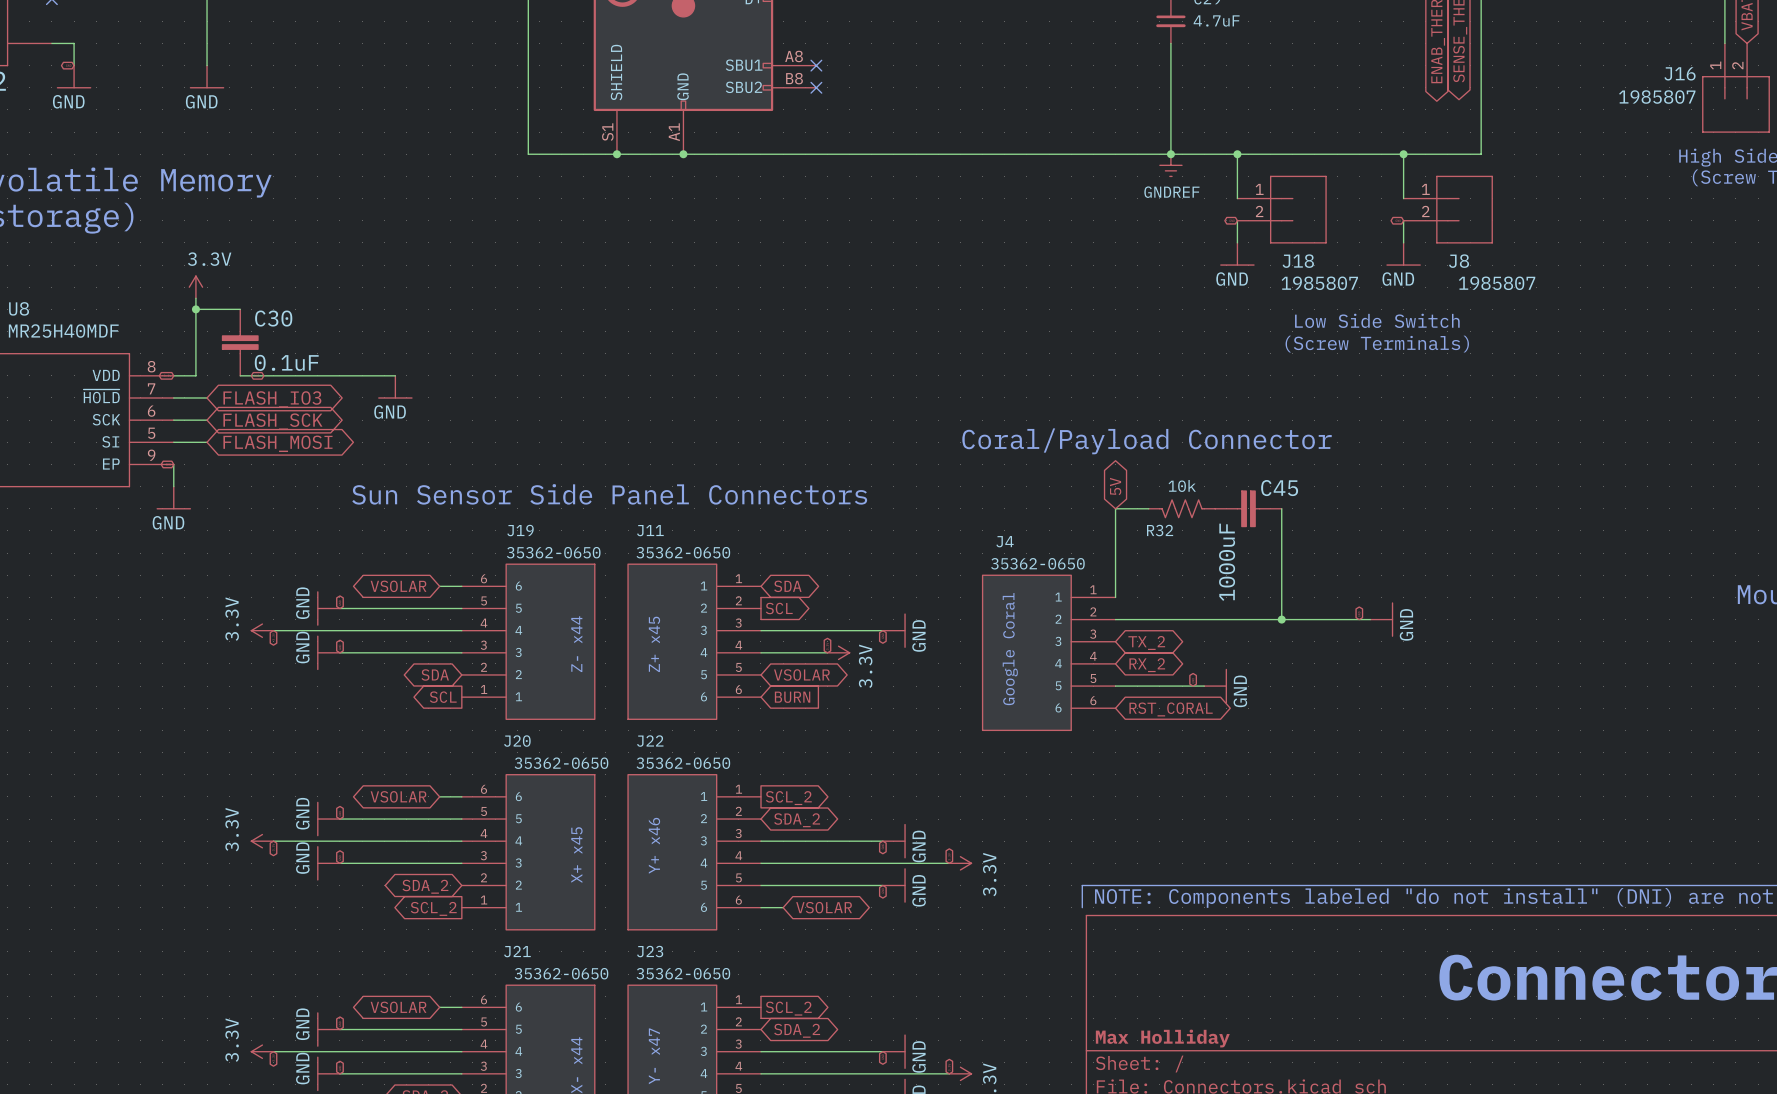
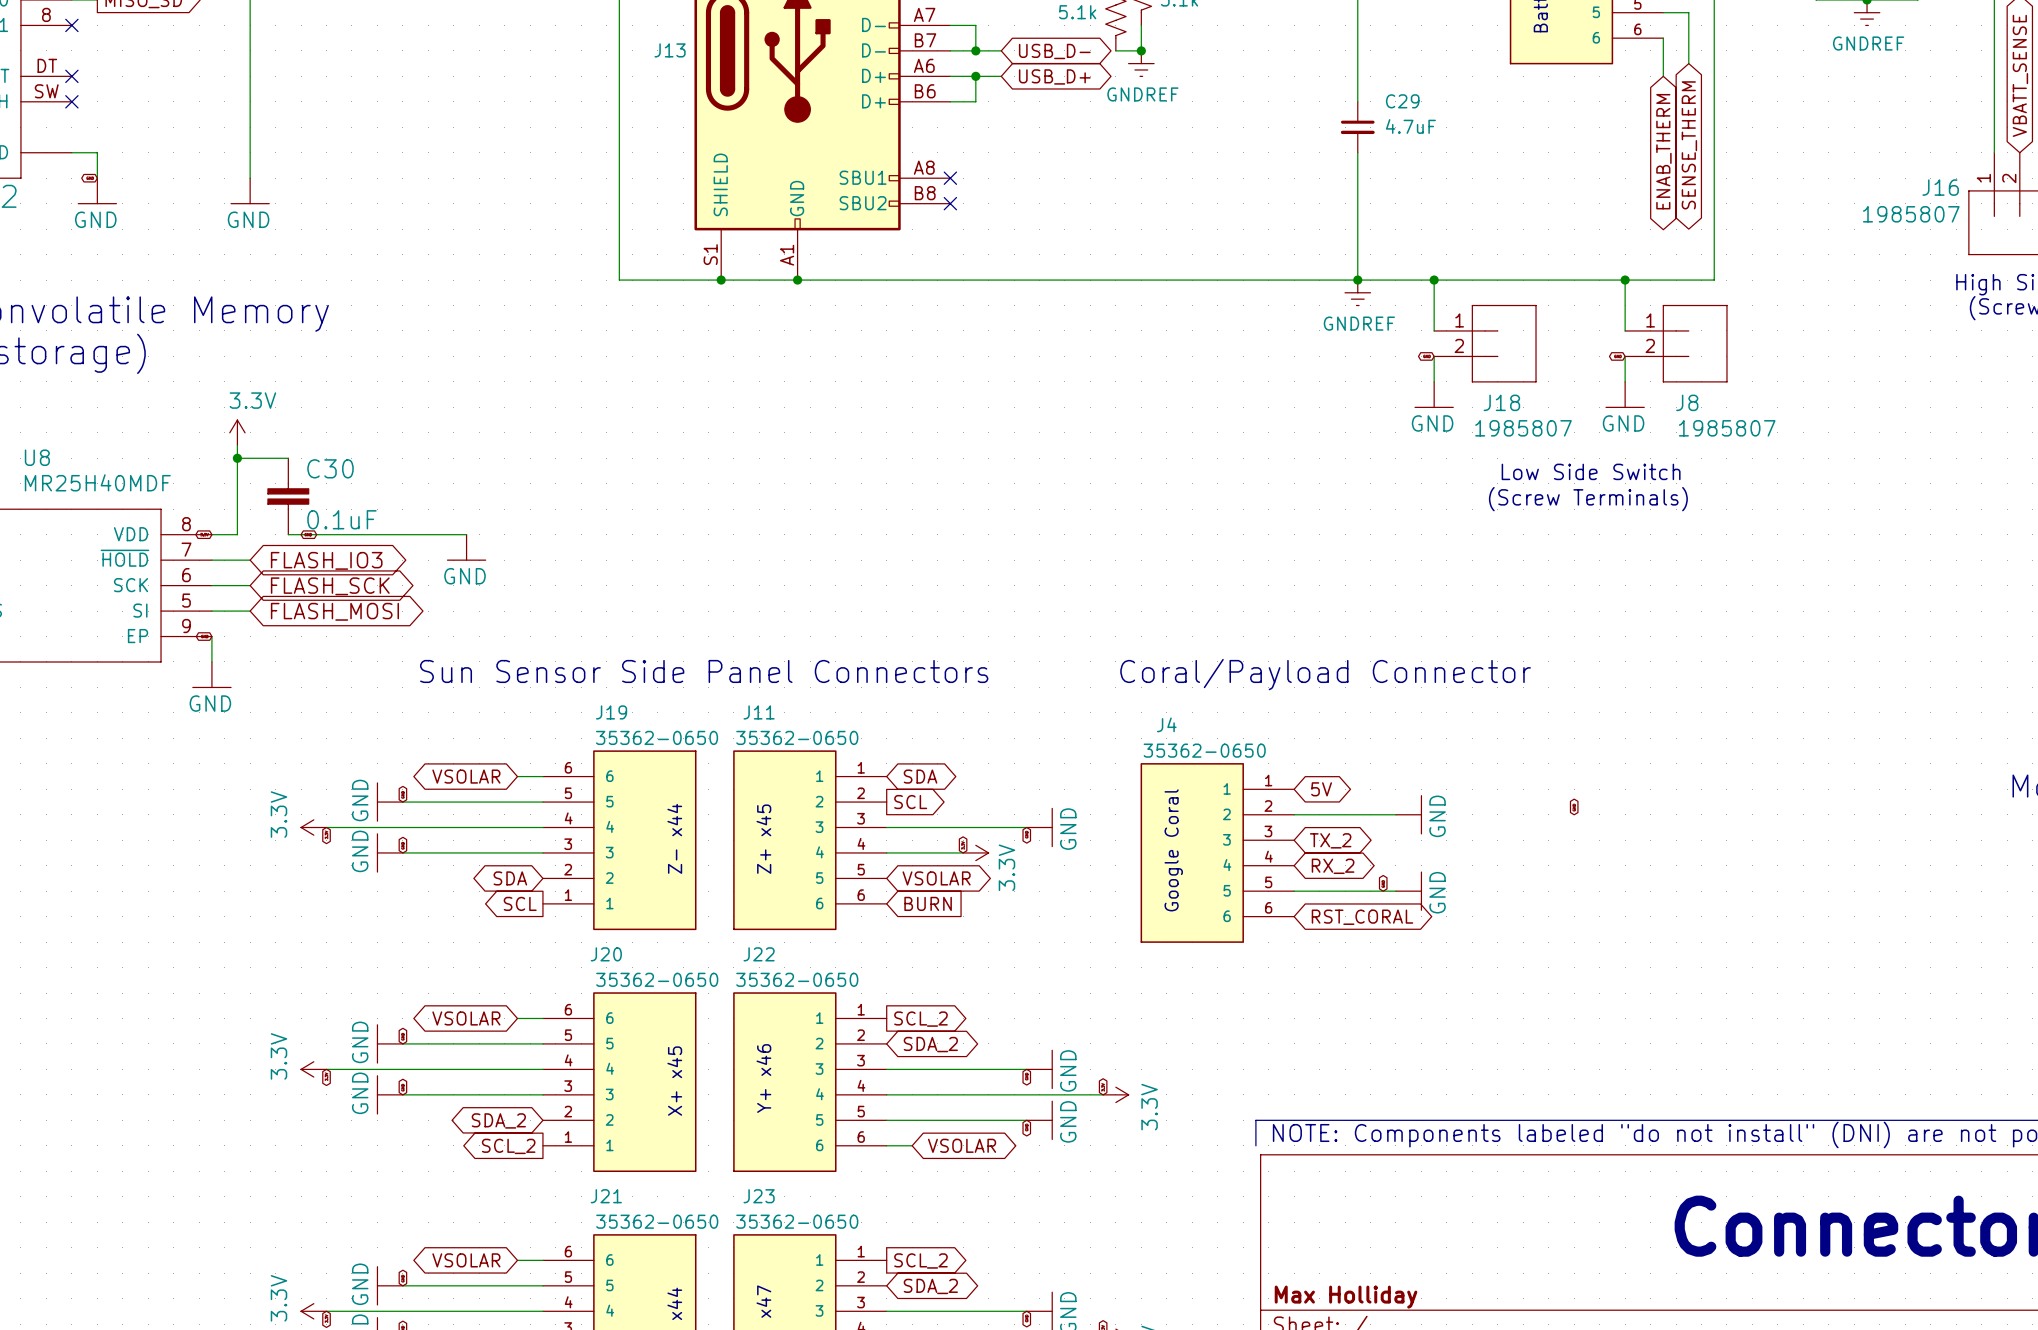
text position: Coral/Payload Connector (1147, 441) -> Coral/Payload Connector (1325, 674)
global label rotation: 0° (1115, 486) -> 90° clockwise (1321, 789)
global label position: 5V (1115, 486) -> 5V (1321, 789)
wire: (1148, 508) (1115, 508) (1115, 597) -> none
R32: 10k (1182, 508) -> none
C45: 1000uF (1248, 508) -> none
wire: (1281, 508) (1281, 619) -> none
wire: (1204, 619) (1370, 619) -> none
junction: (1281, 619) -> none
power symbol position: GND (1381, 619) -> GND (1408, 814)

